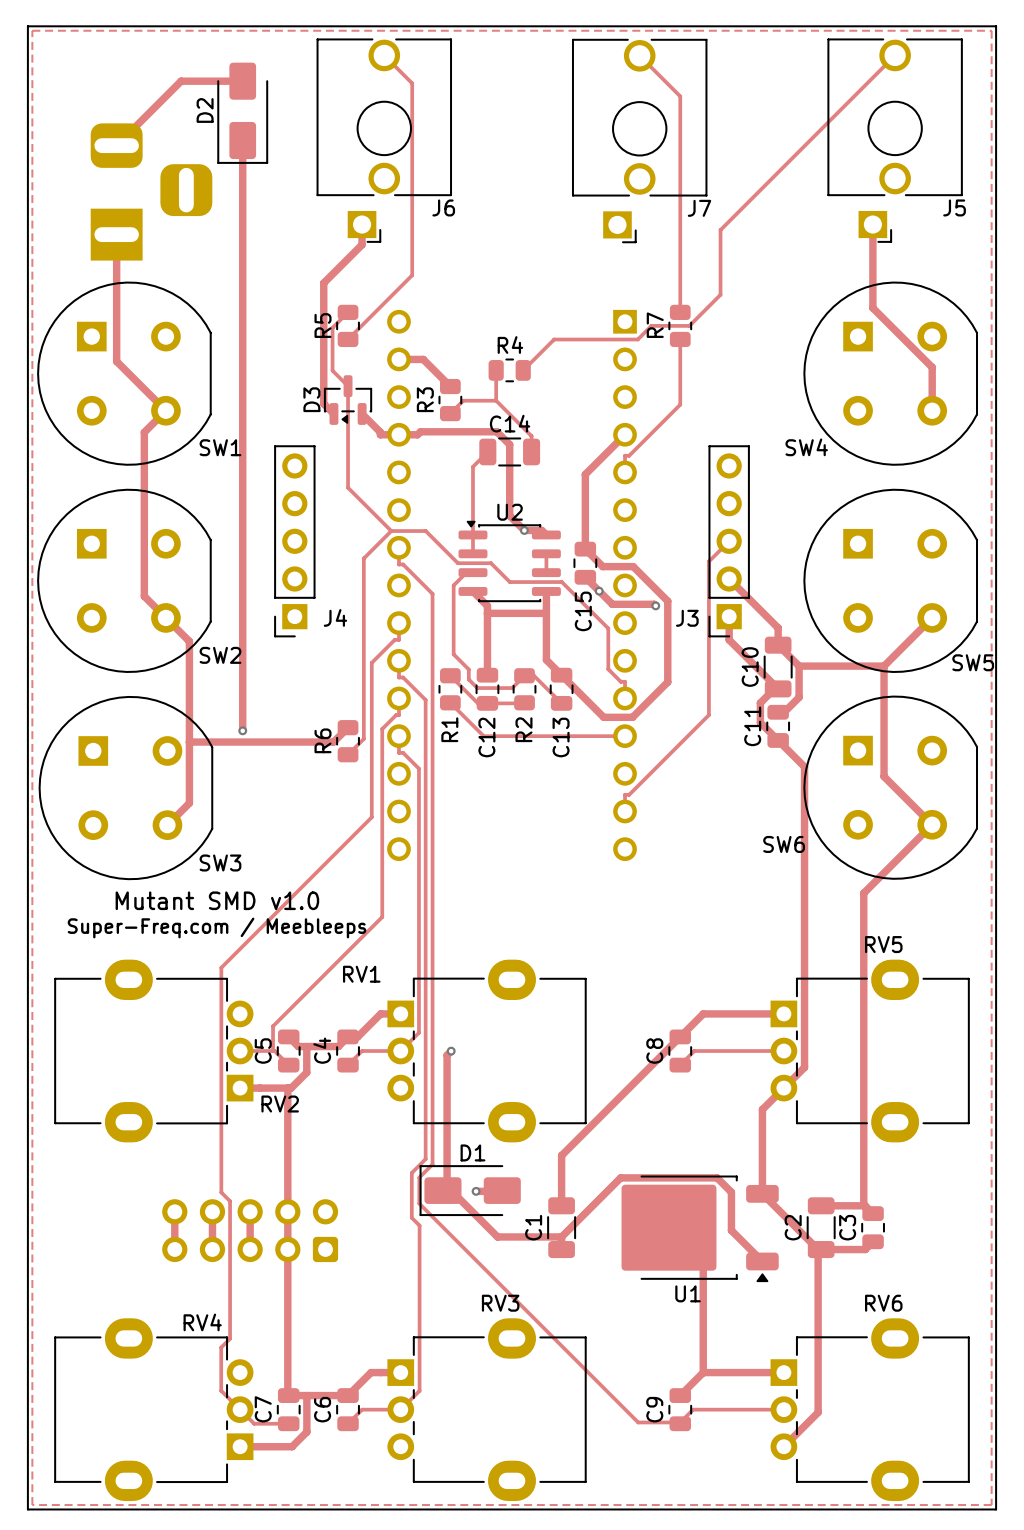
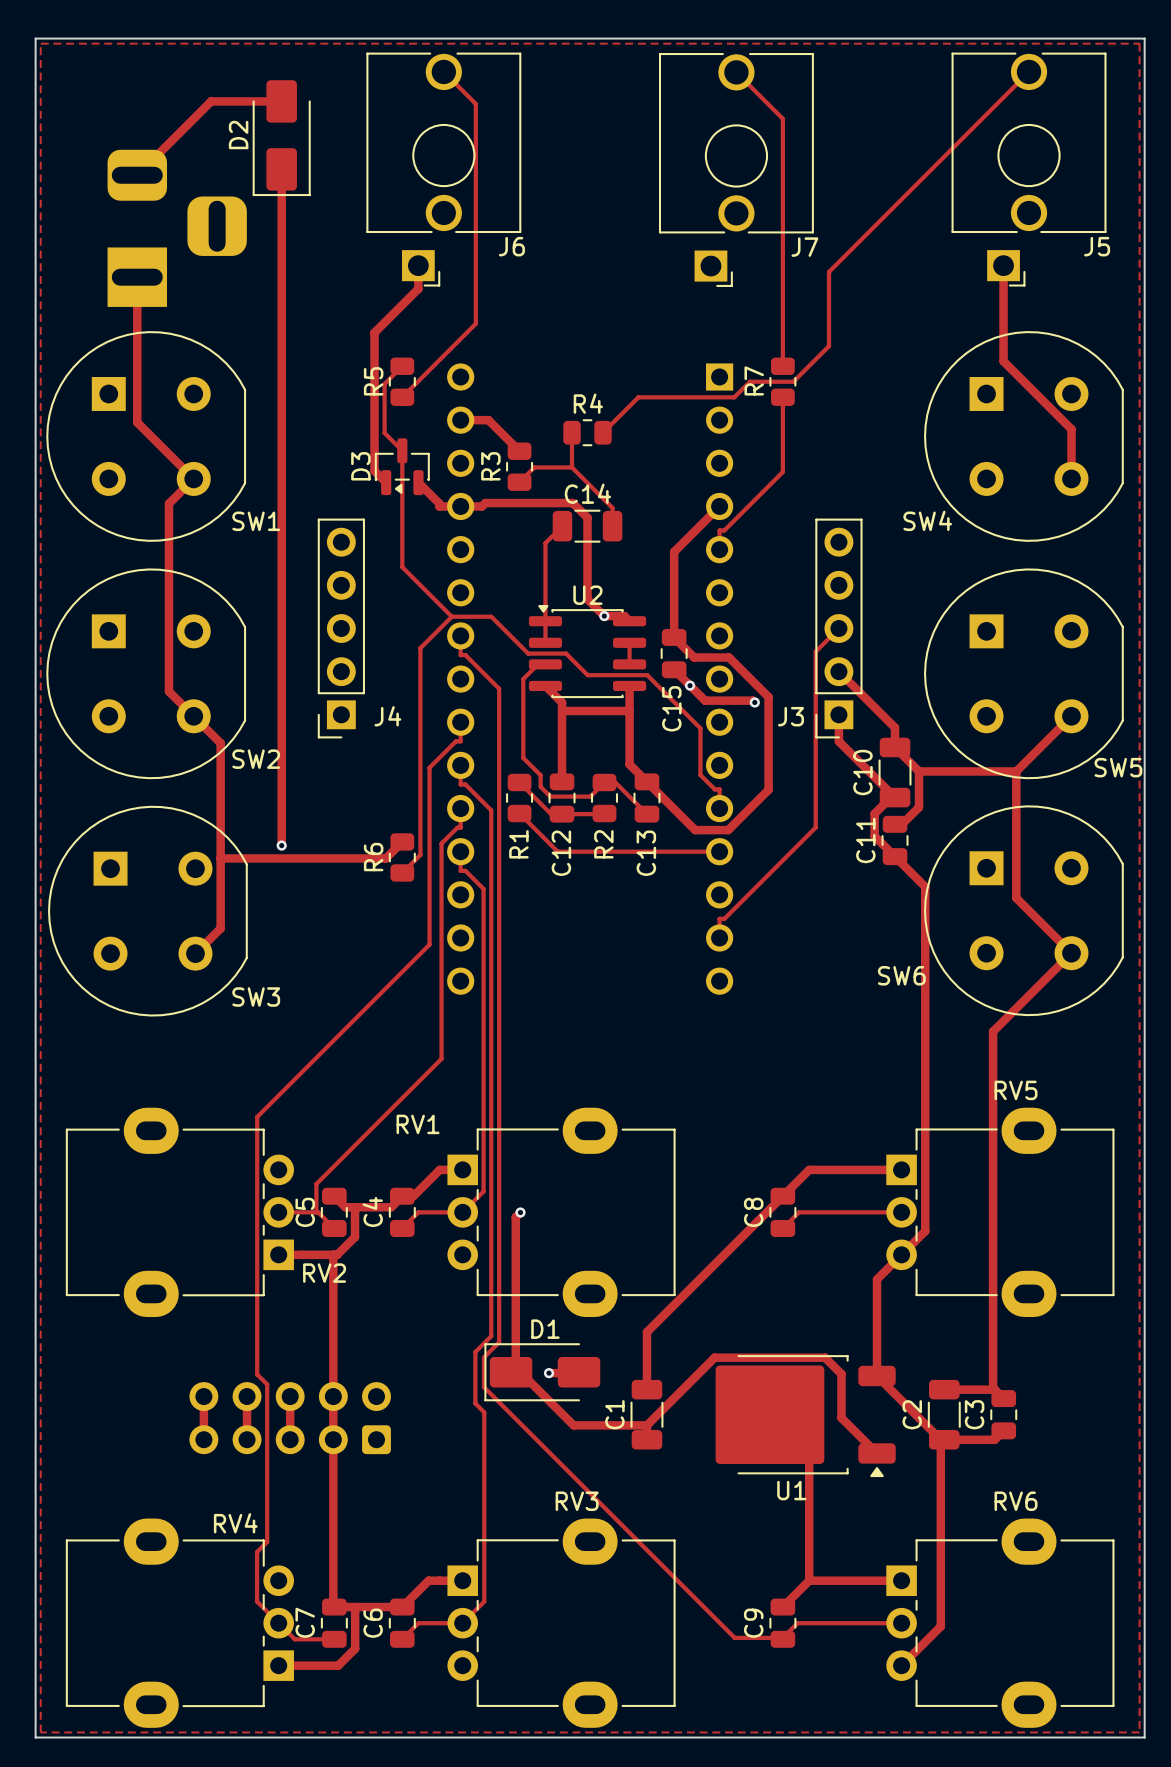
text: Mutant SMD v1.0 (217, 900) -> none
text: Super-Freq.com / Meebleeps (217, 928) -> none

